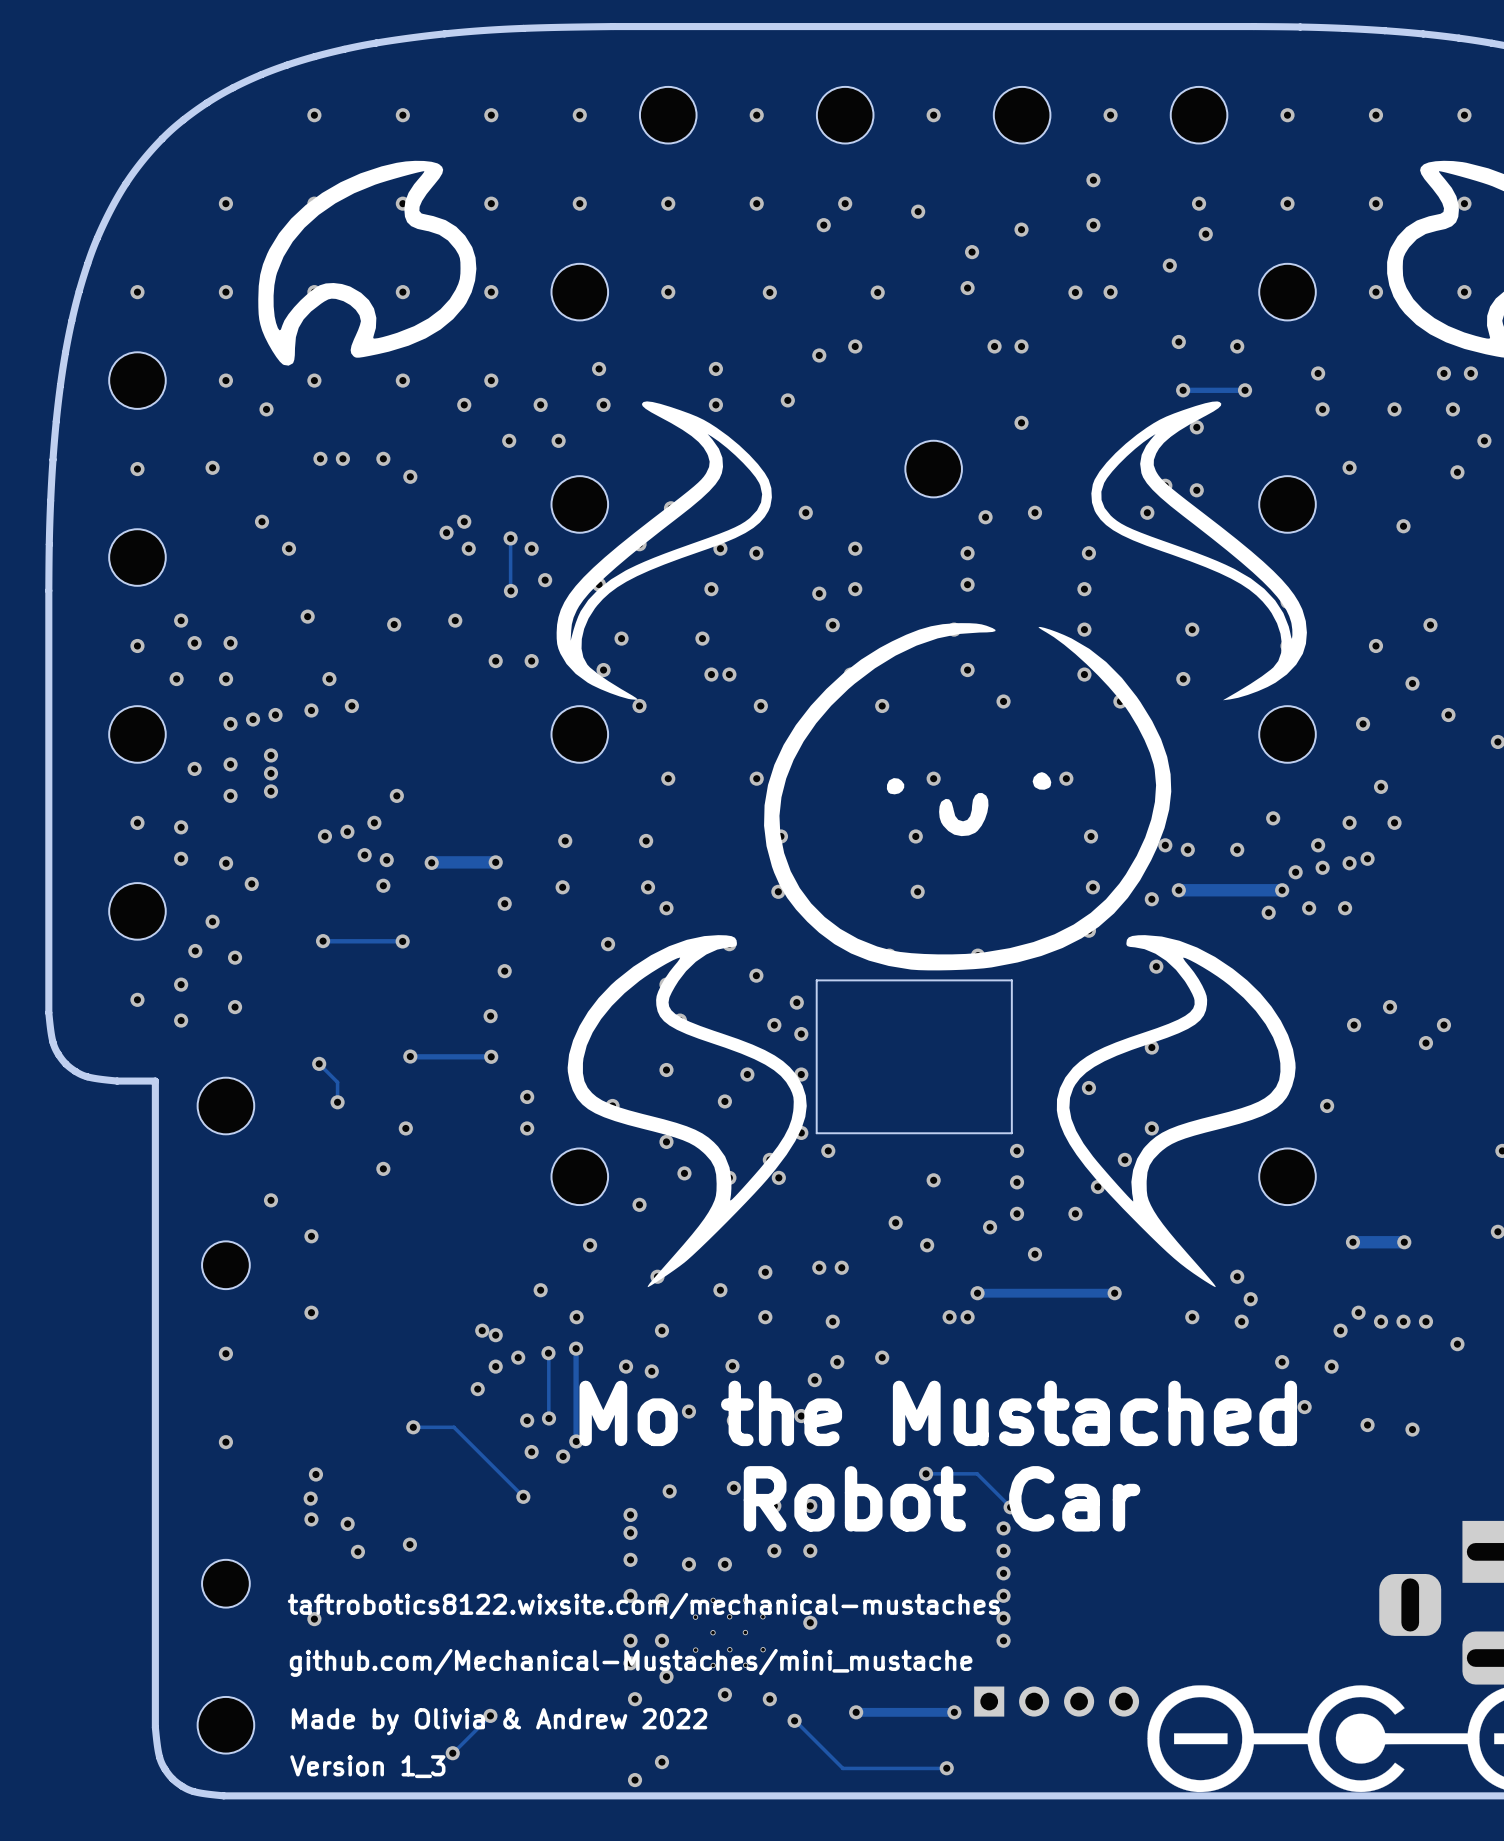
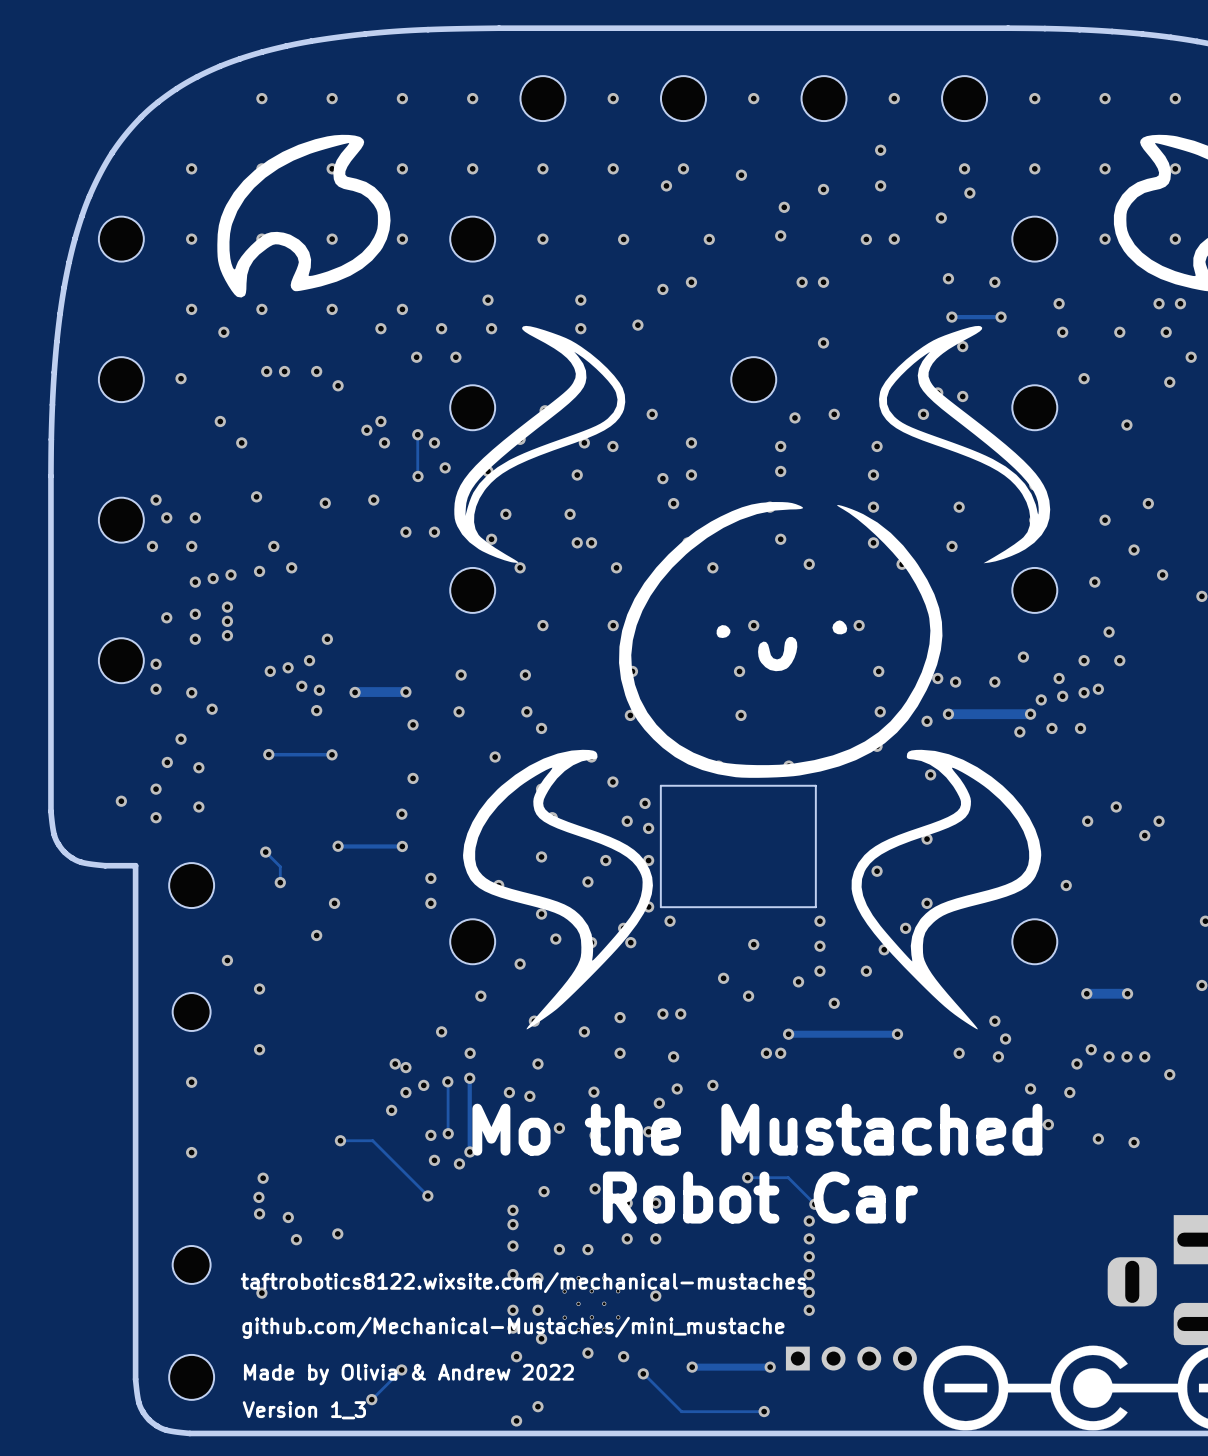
part: none -> (121, 239)
via: (137, 292) -> none
part: (137, 380) -> none
part: none -> (121, 379)
via: (137, 469) -> none
part: (137, 557) -> none
part: none -> (121, 520)
via: (137, 645) -> none
part: (137, 734) -> none
part: none -> (121, 660)
via: (137, 822) -> none
part: (137, 911) -> none

